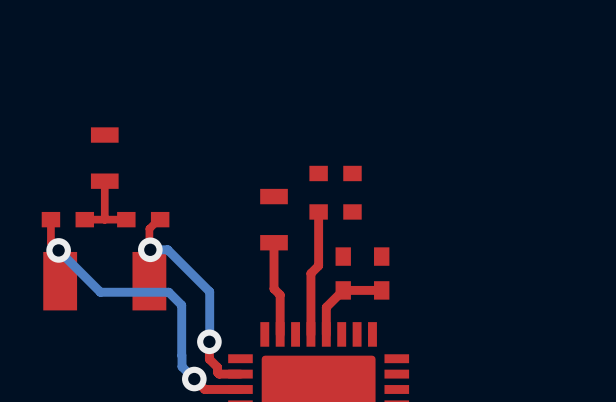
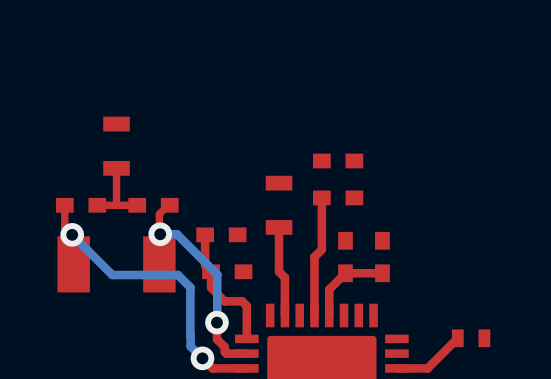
top track: none -> (205, 234) (205, 265) (211, 271) (211, 287) (224, 301) (242, 301) (246, 306) (246, 338)
part: none -> (221, 234)
part: none -> (227, 271)
top track: none -> (457, 338) (427, 368) (396, 368)
part: none -> (471, 338)

